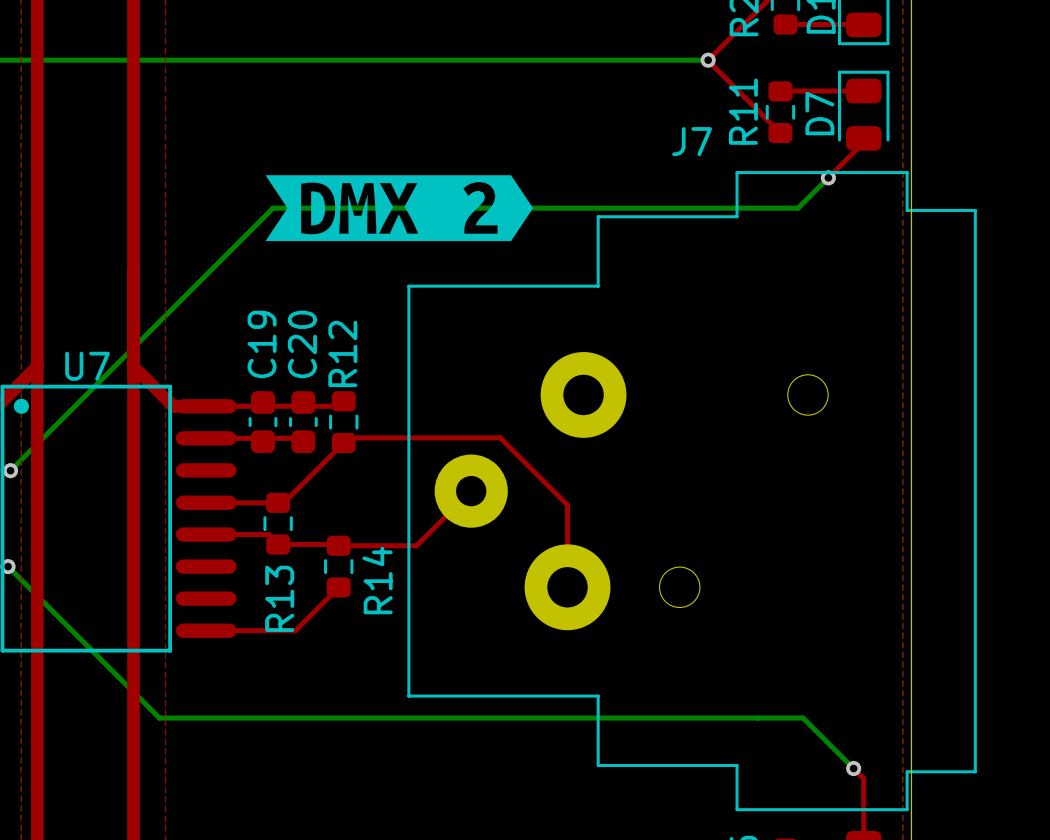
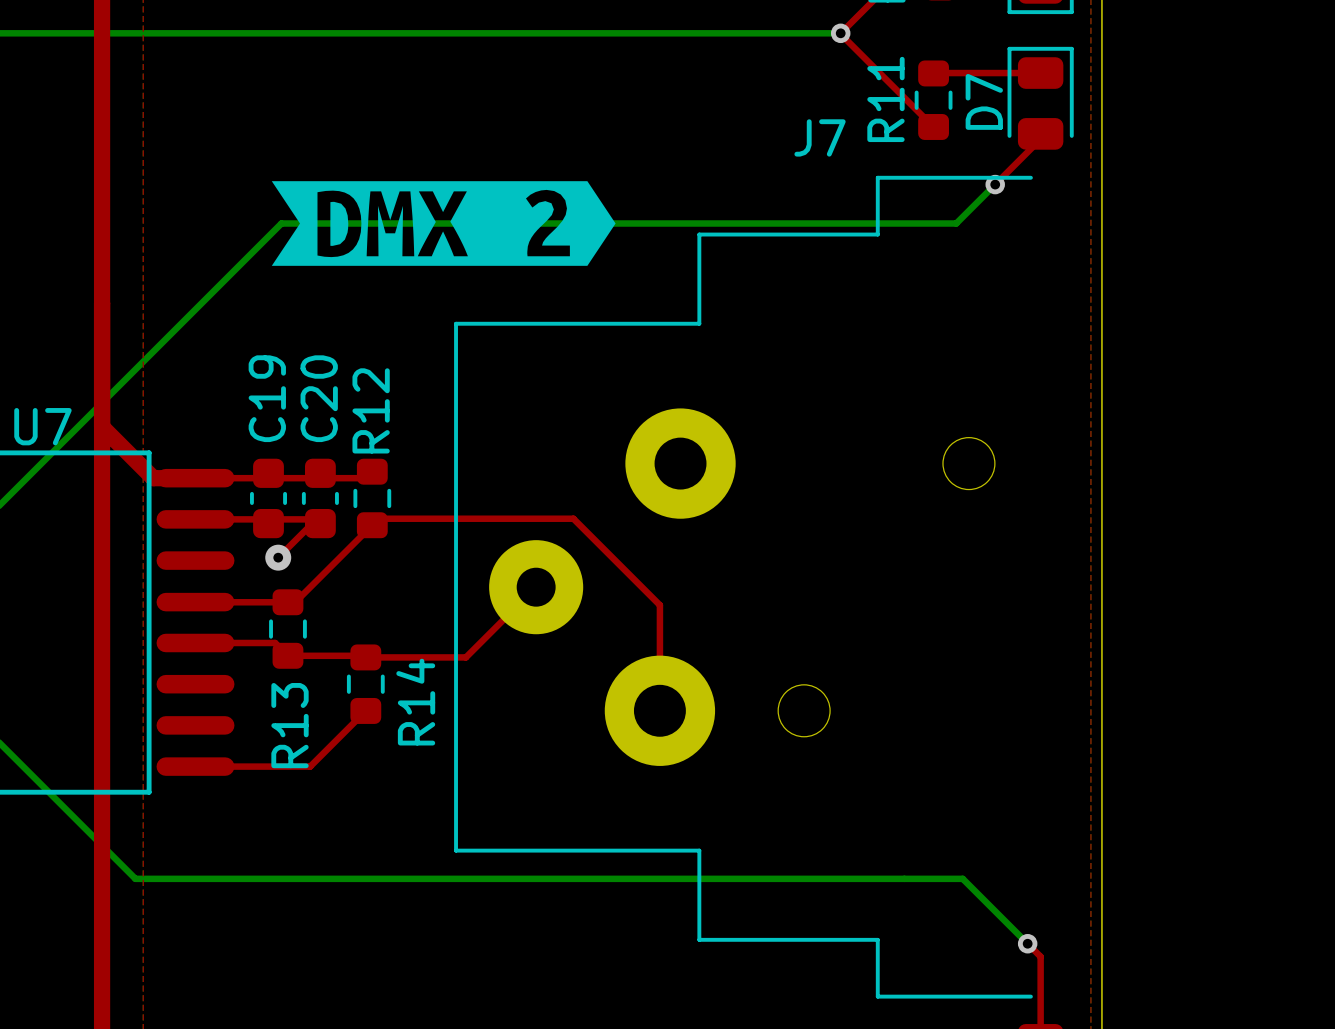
J7 footprint: [407, 171, 977, 812] -> [454, 175, 1033, 999]
top track: none -> (320, 523) (312, 523) (278, 557)
via: none -> (278, 557)

